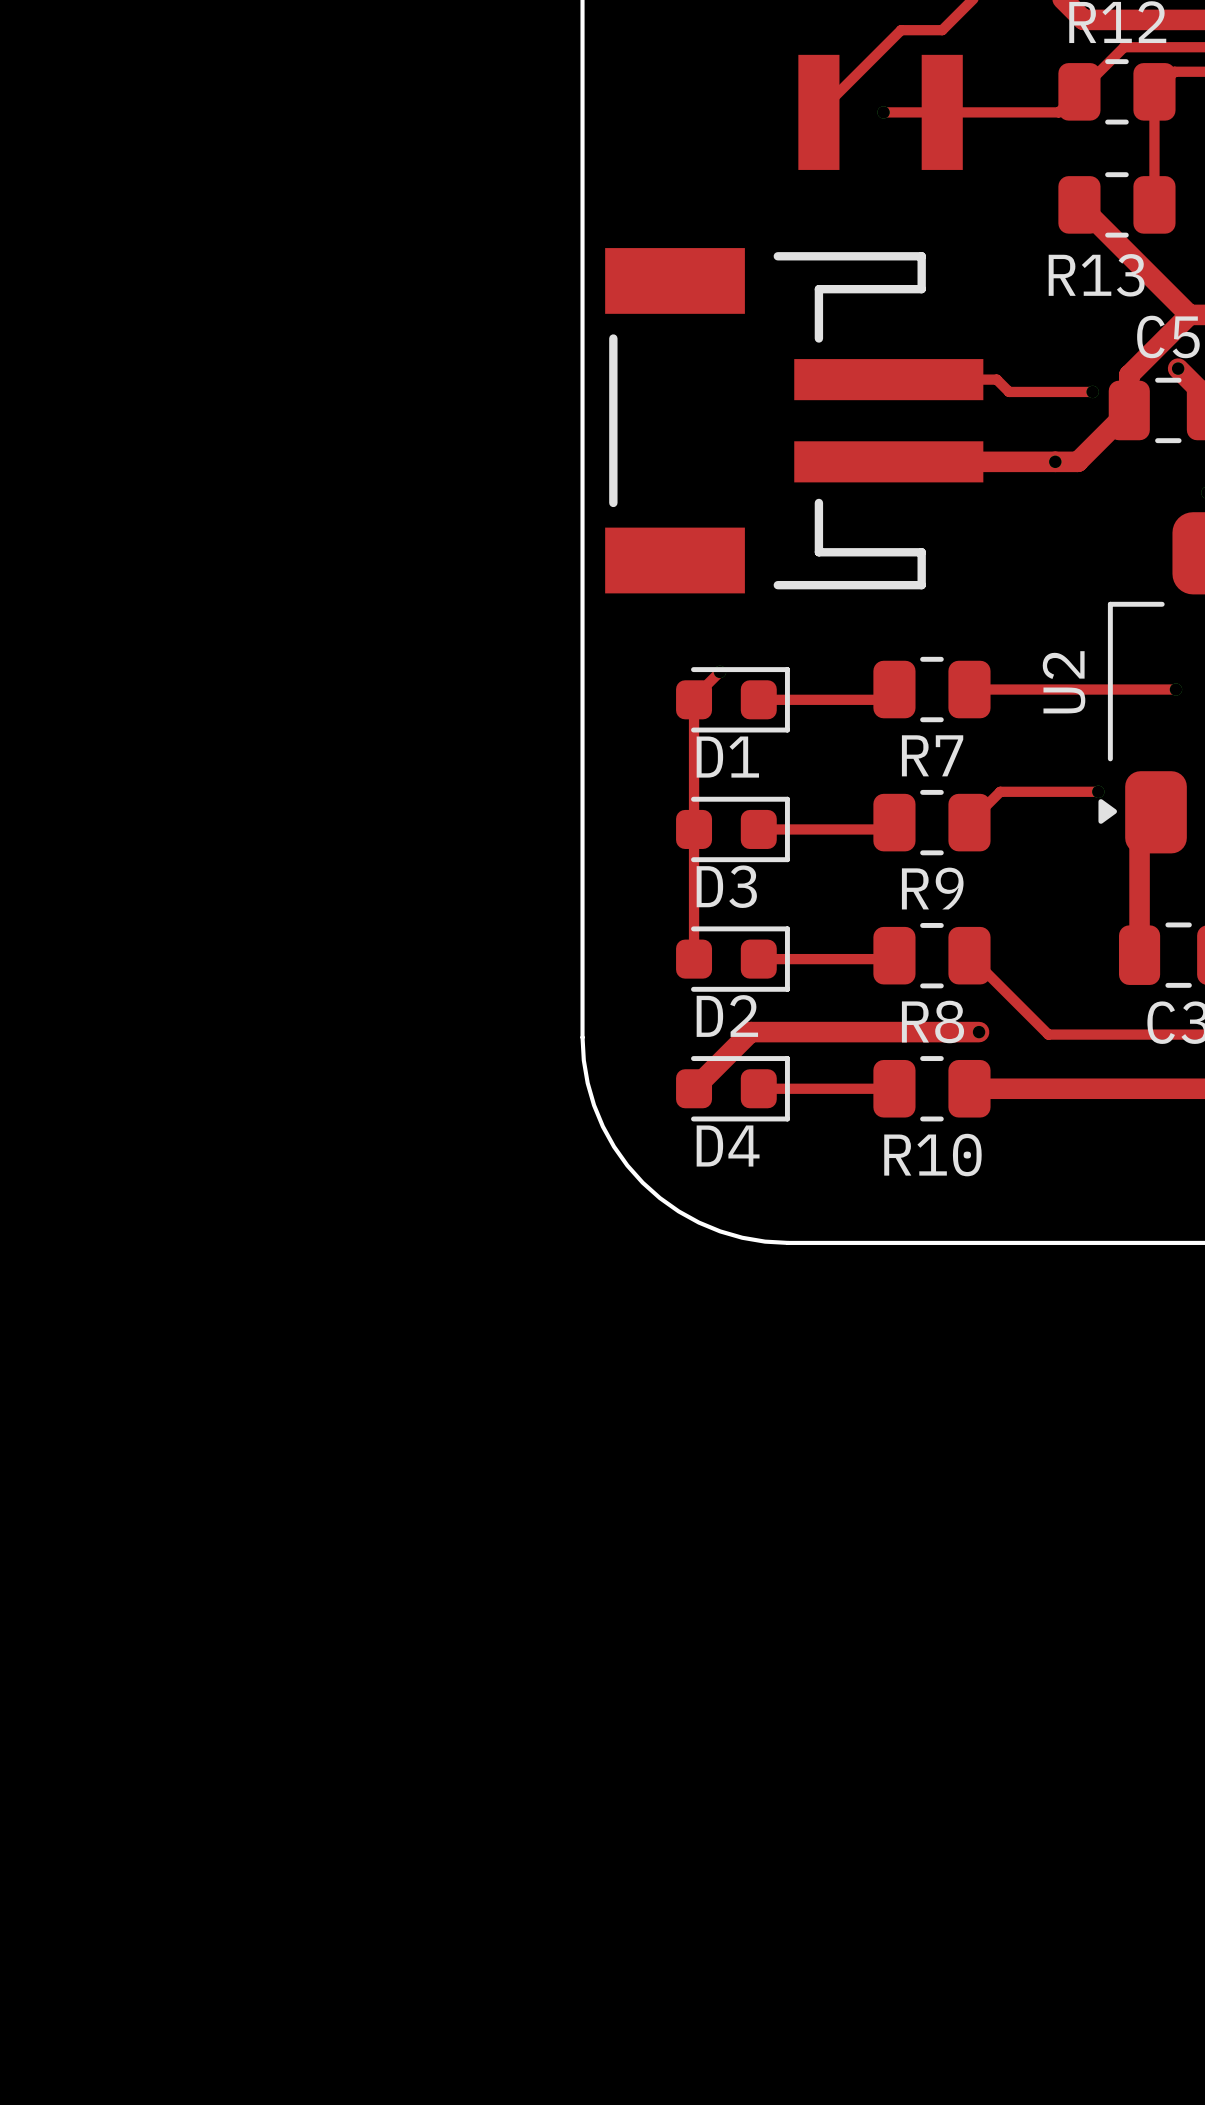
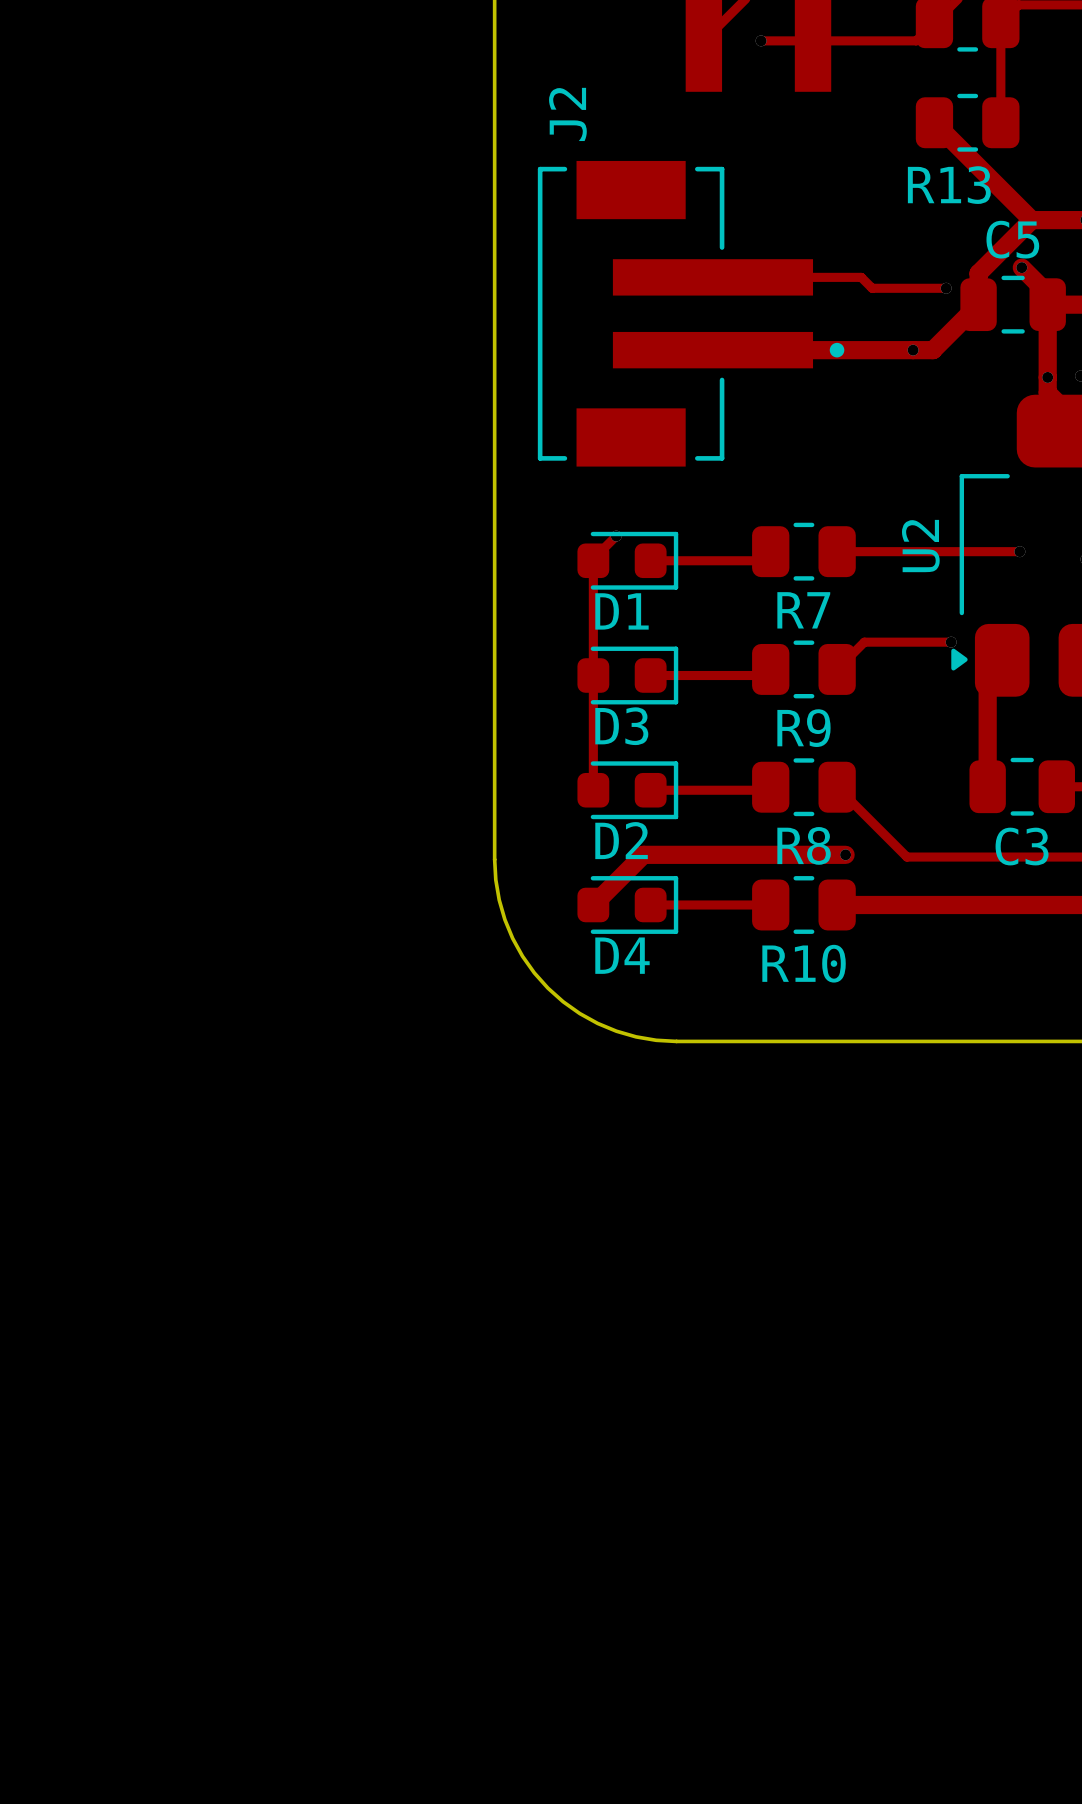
part: (794, 420) -> none
J2: none -> (691, 313)

